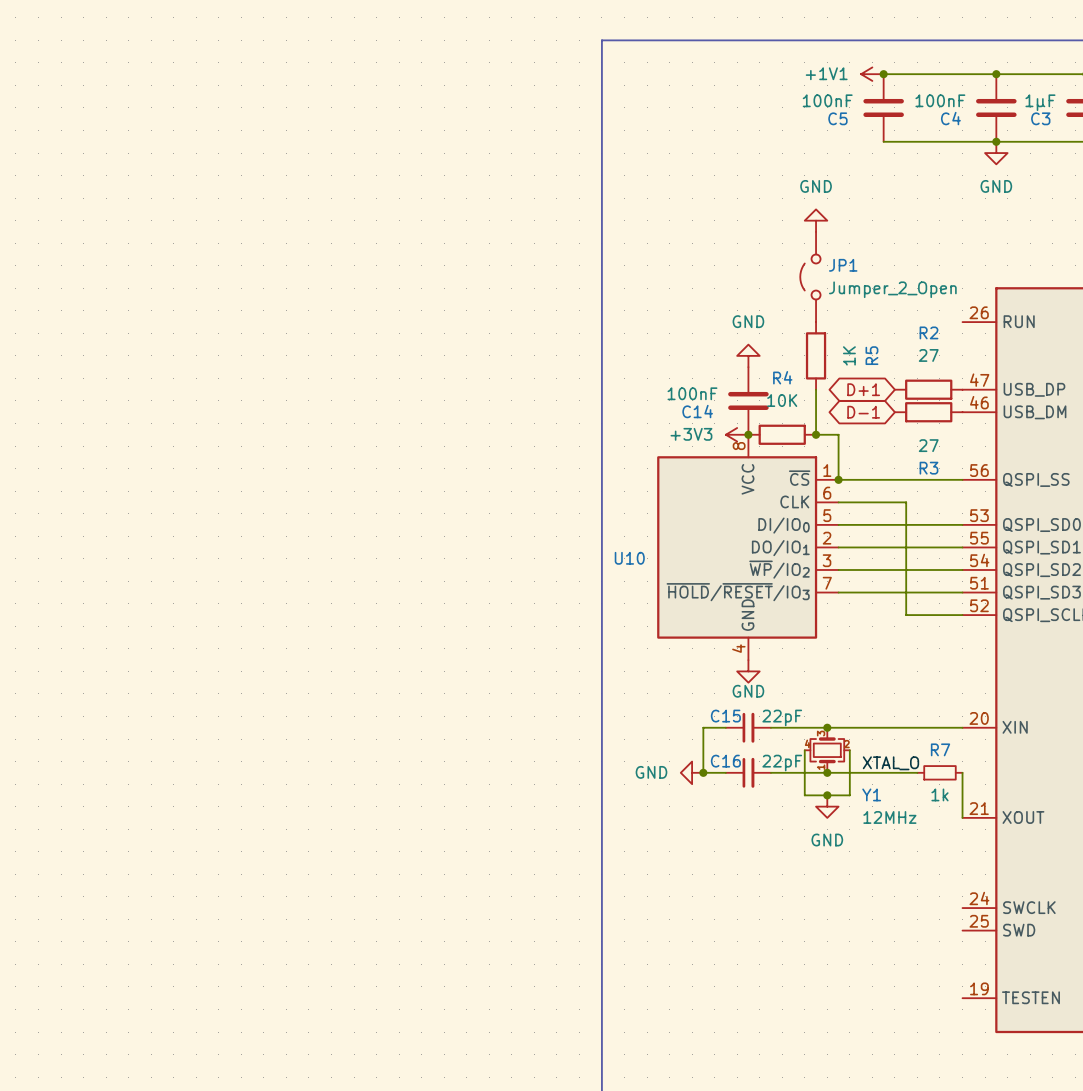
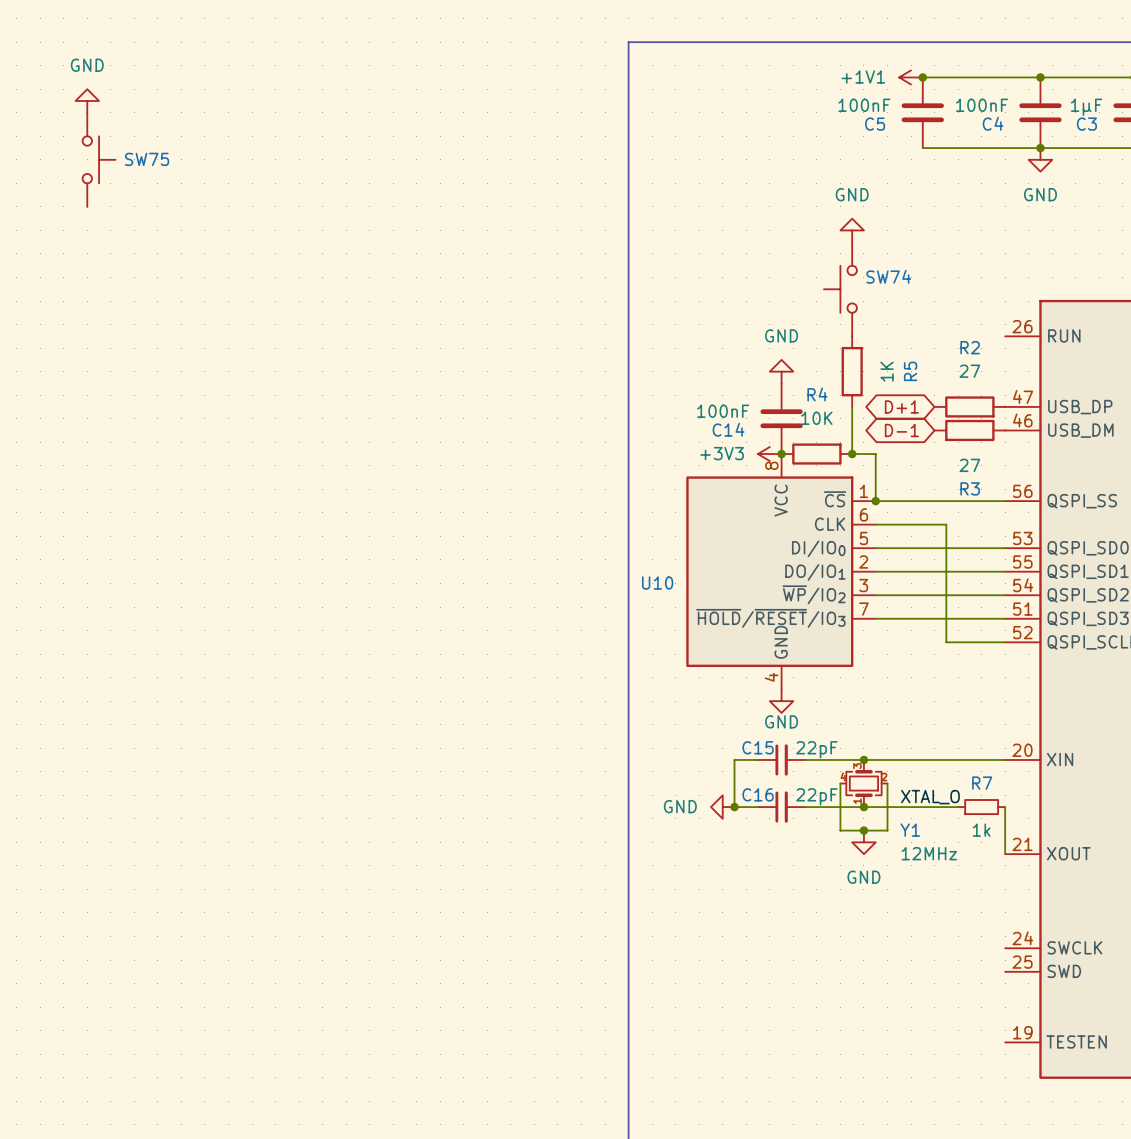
power symbol: none -> GND (87, 101)
SW75: none -> (99, 159)
SW74: none -> (840, 289)
JP1: Jumper_2_Open (810, 277) -> none

